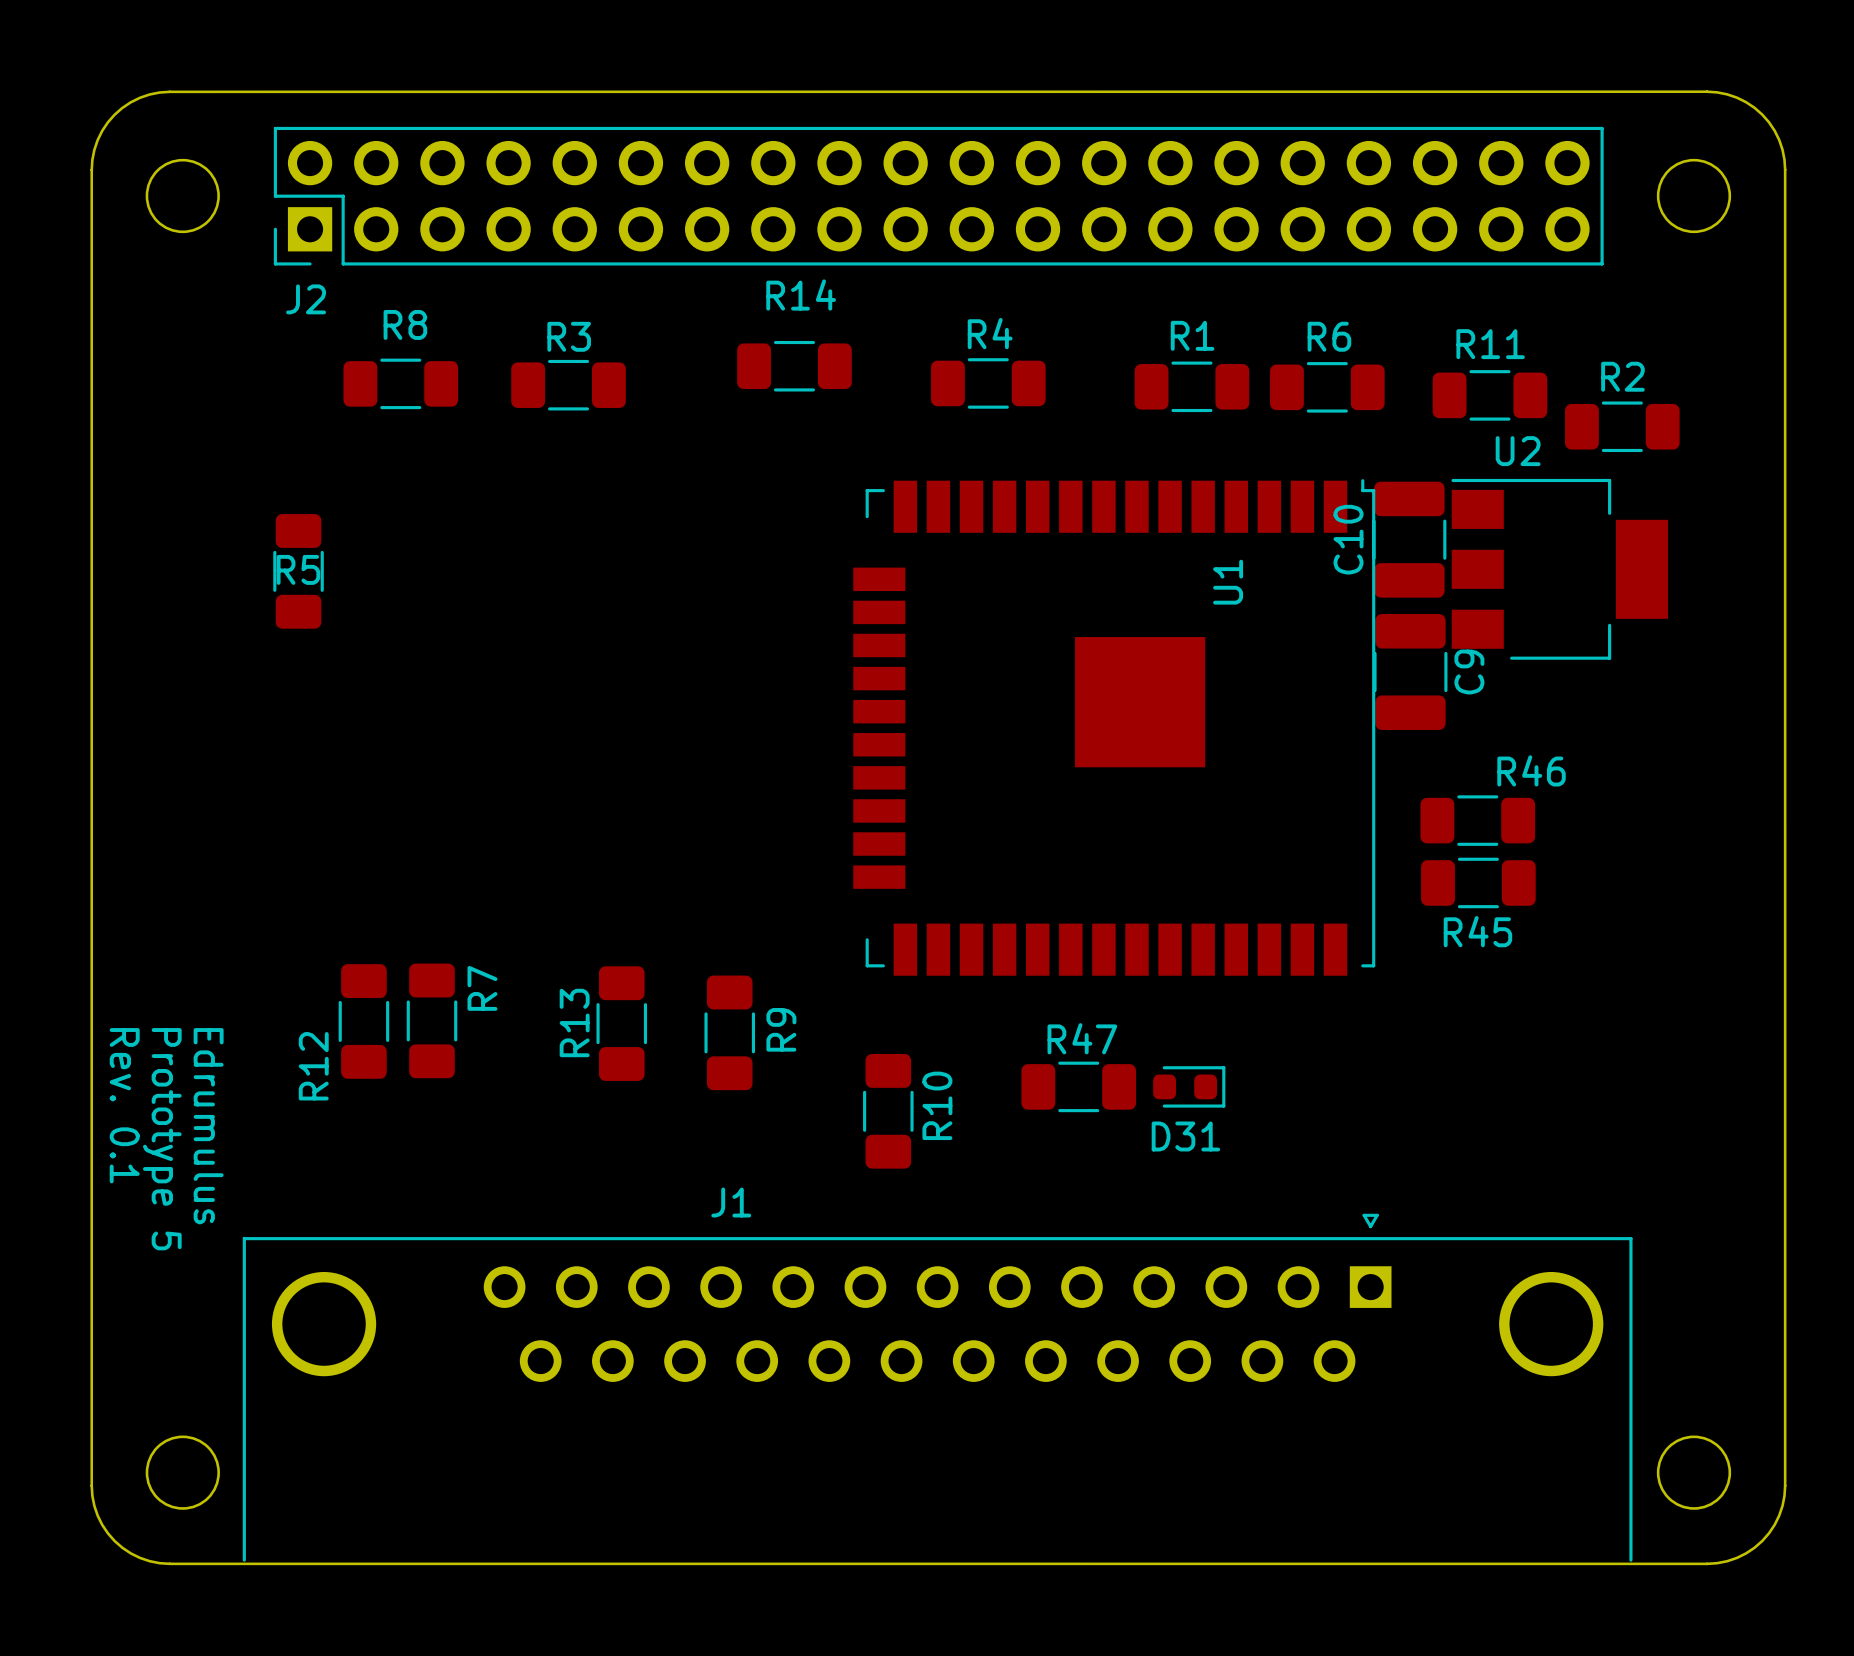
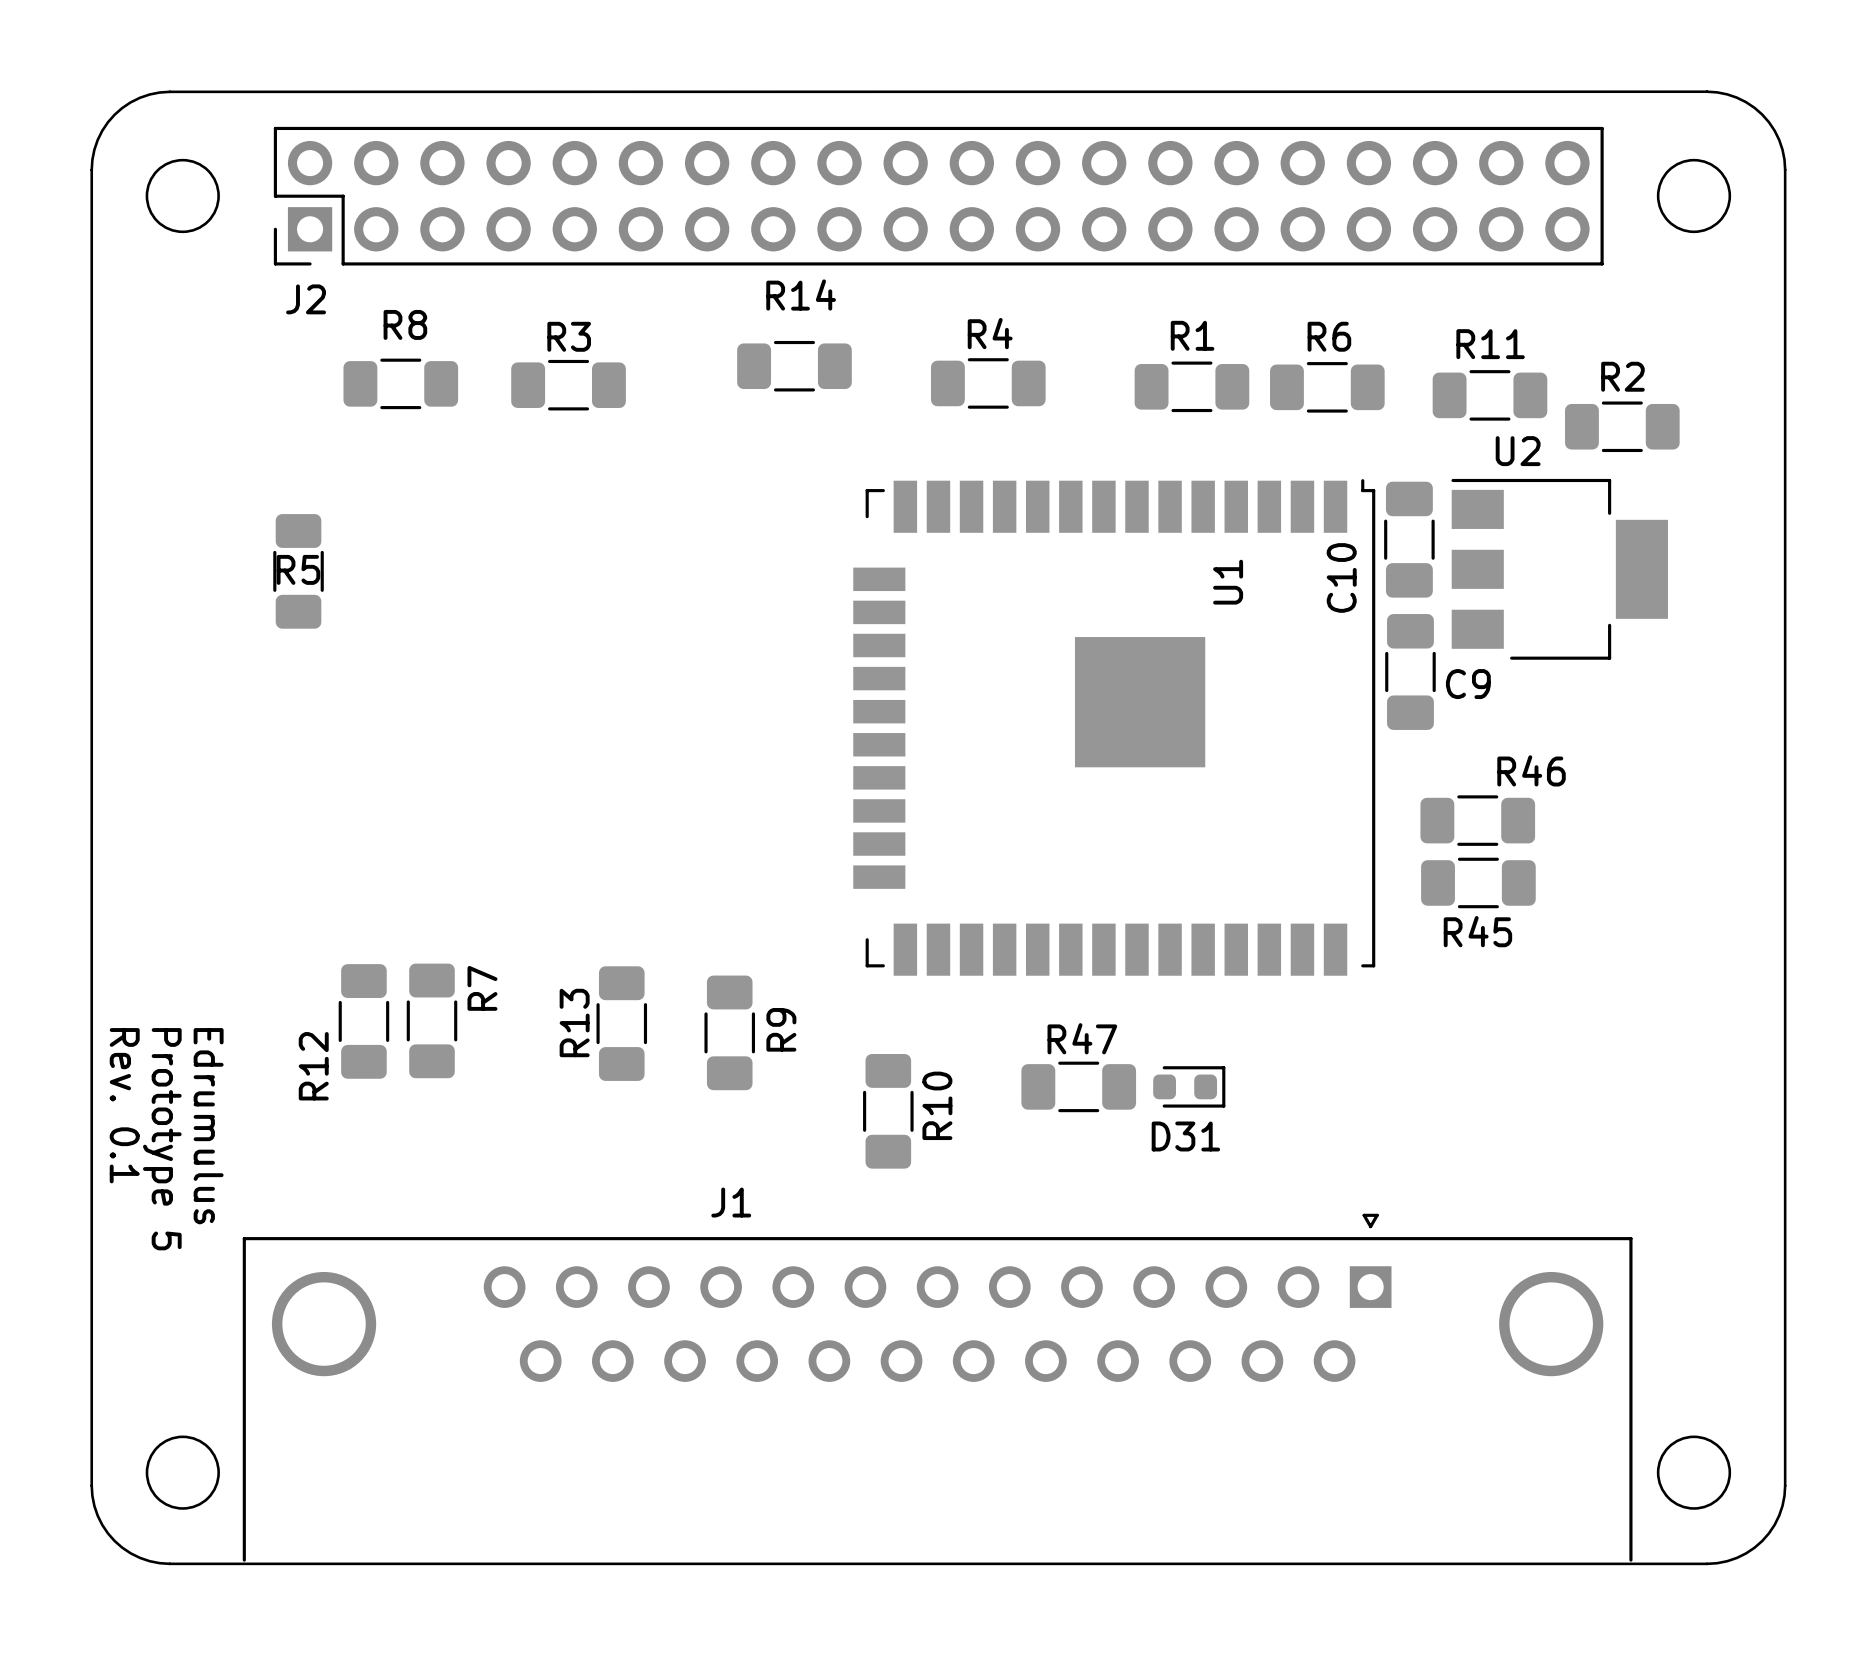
C10 footprint: [1372, 481, 1447, 598] -> [1384, 481, 1435, 598]
C10 name position: C10 (1348, 539) -> C10 (1341, 577)
C9 footprint: [1373, 614, 1448, 730] -> [1385, 614, 1436, 730]
C9 name rotation: 0° (1469, 671) -> 90° clockwise (1468, 684)

